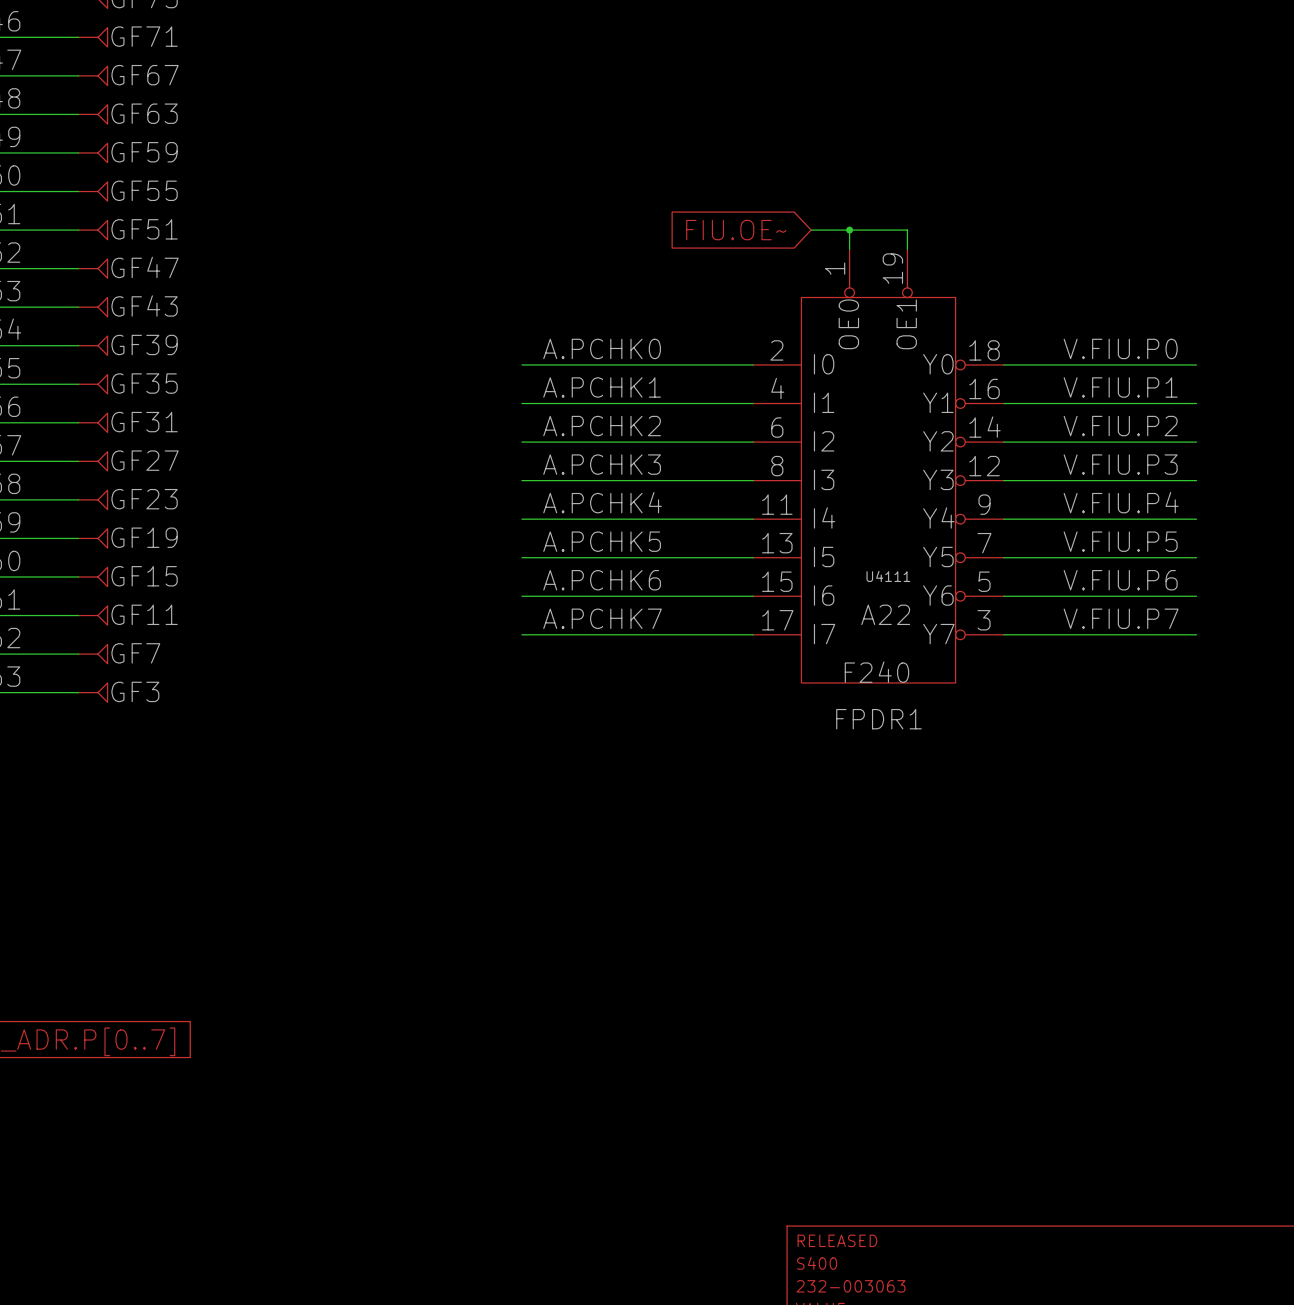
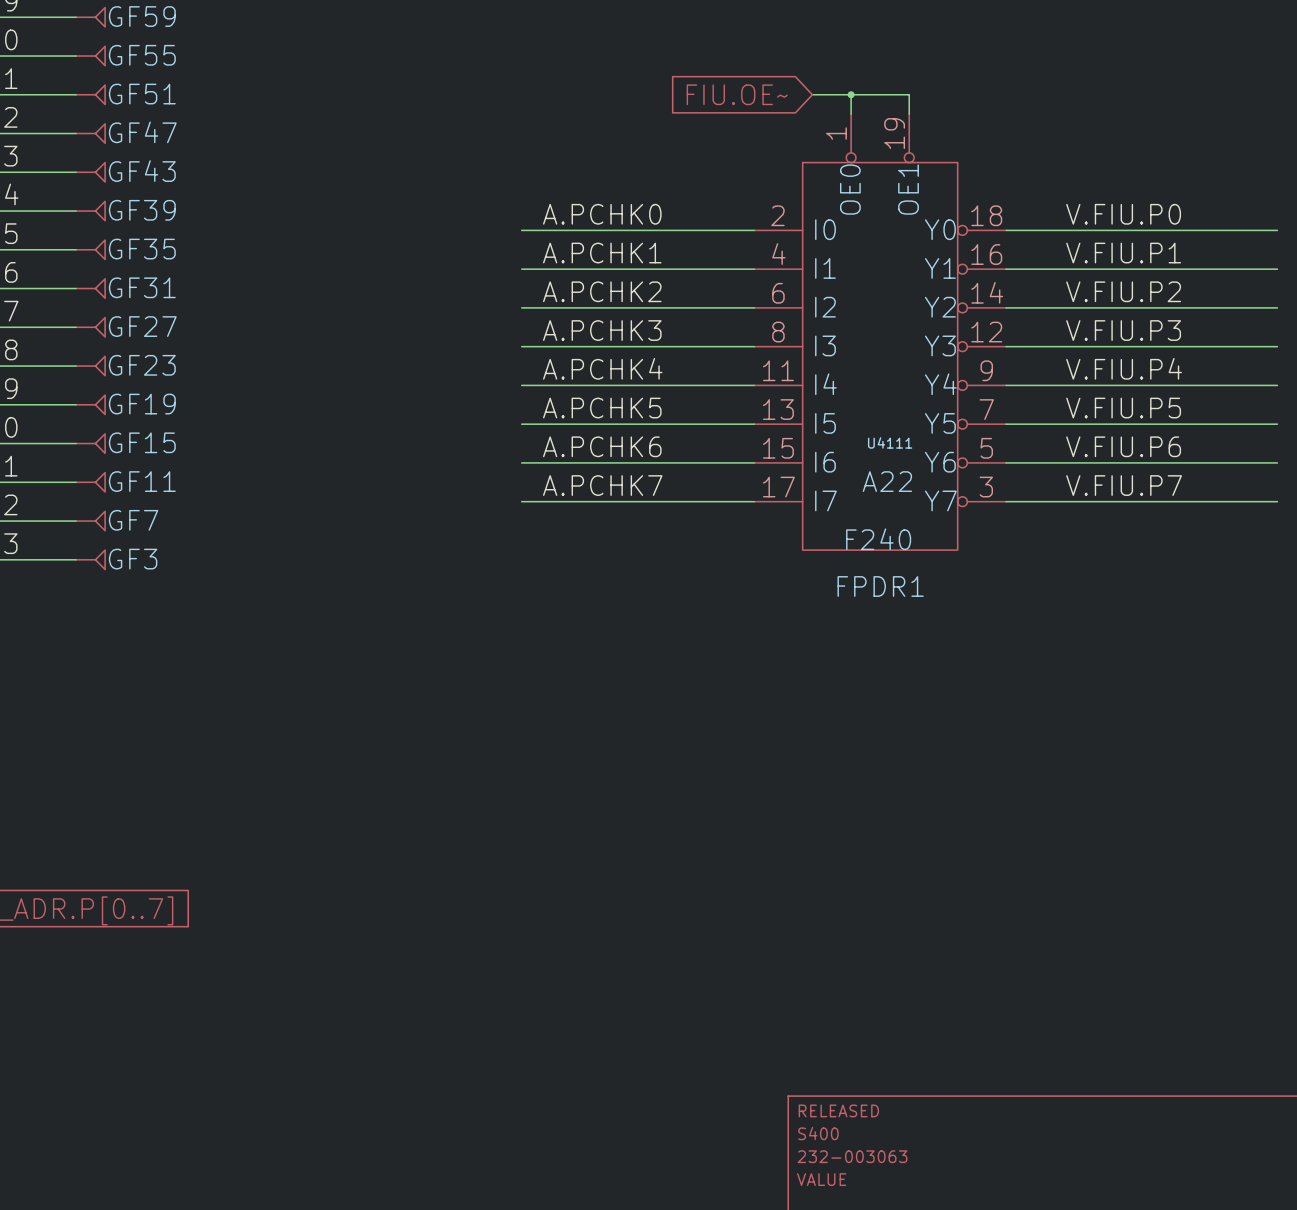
wire: none -> (1199, 230) (1277, 230)
wire: none -> (1199, 269) (1277, 269)
wire: none -> (1199, 307) (1277, 307)
wire: none -> (1199, 346) (1277, 346)
wire: none -> (1199, 385) (1277, 385)
wire: none -> (1199, 424) (1277, 424)
wire: none -> (1199, 462) (1277, 462)
wire: none -> (1199, 501) (1277, 501)

